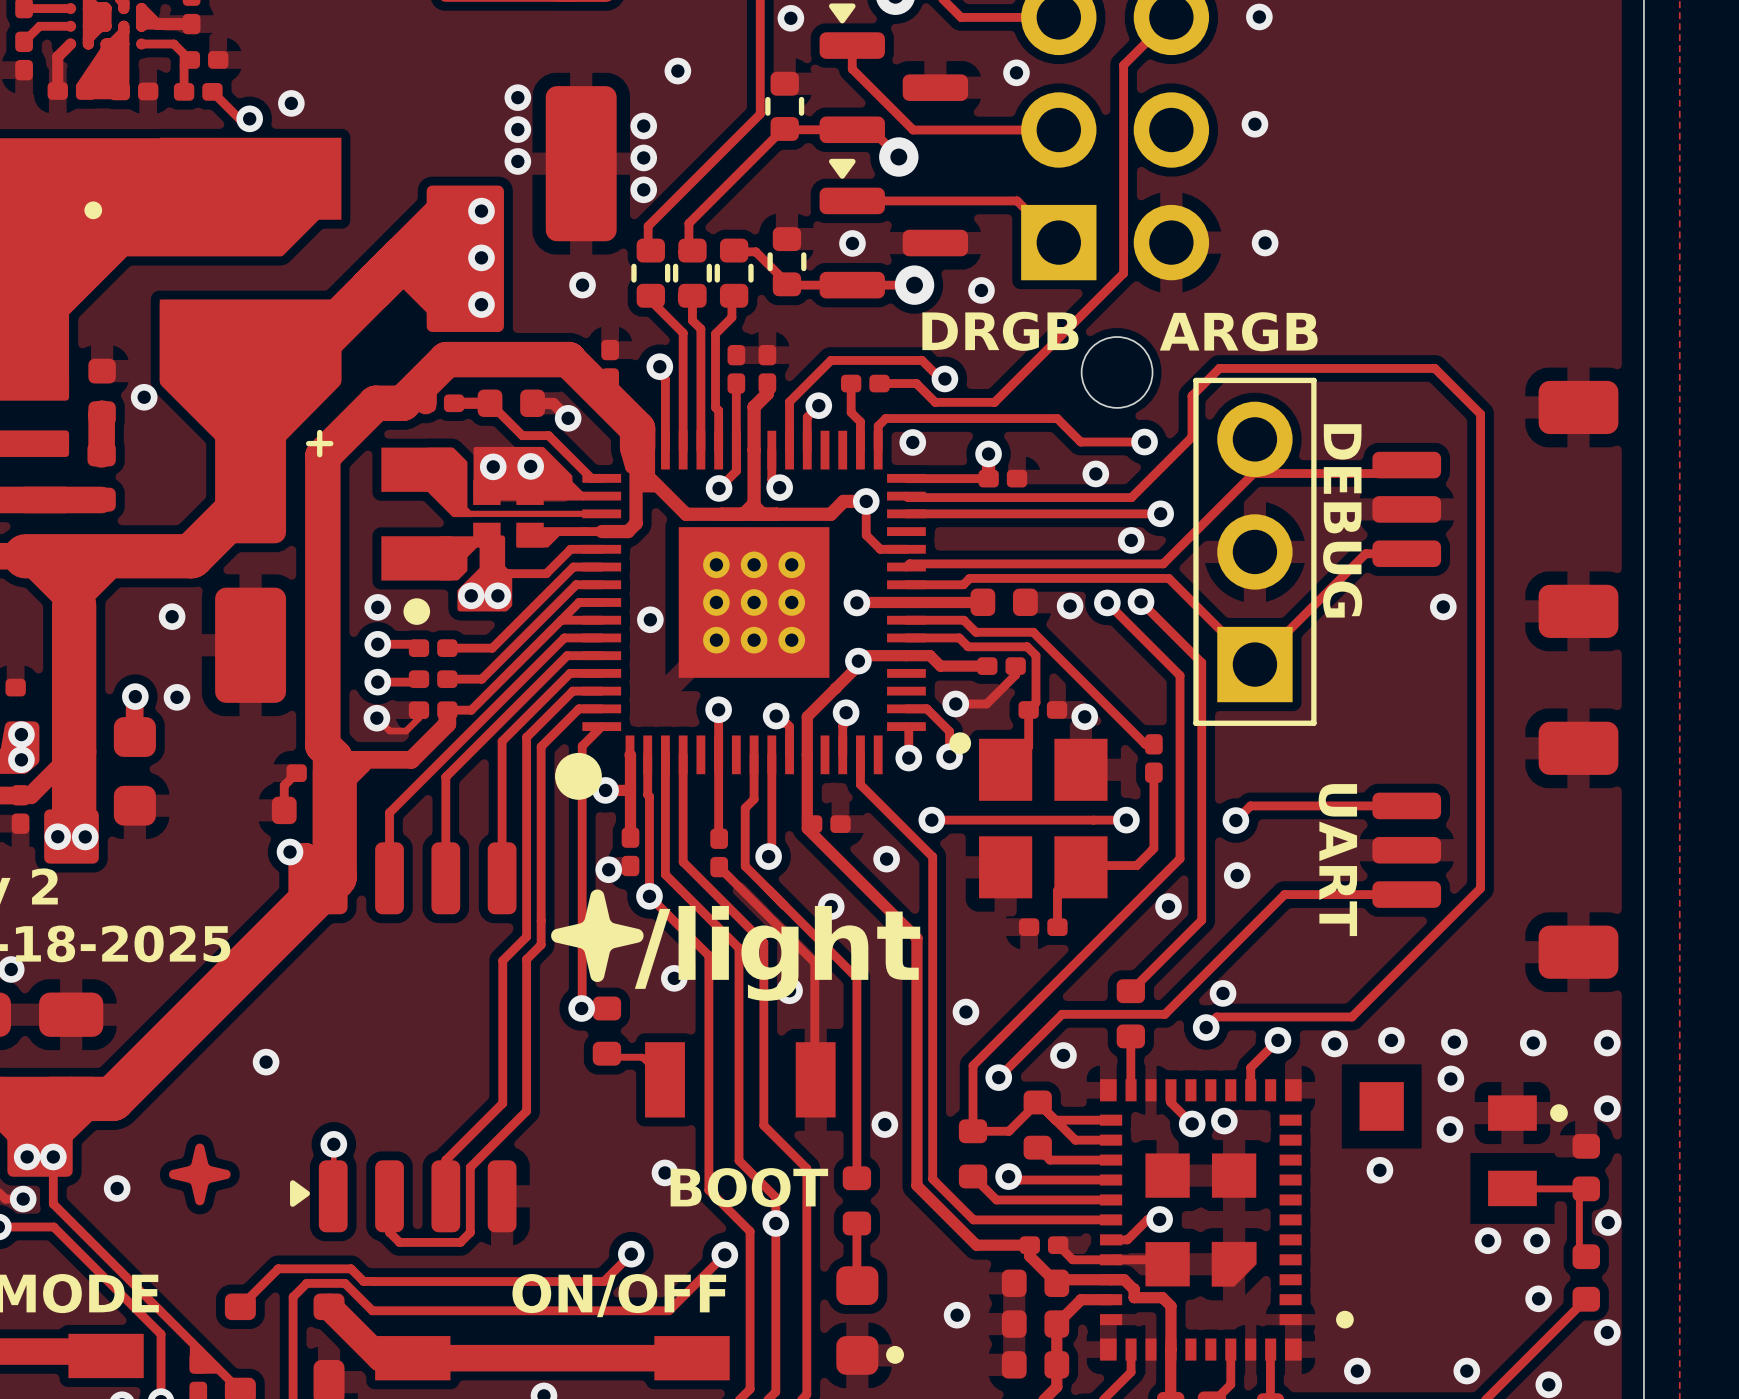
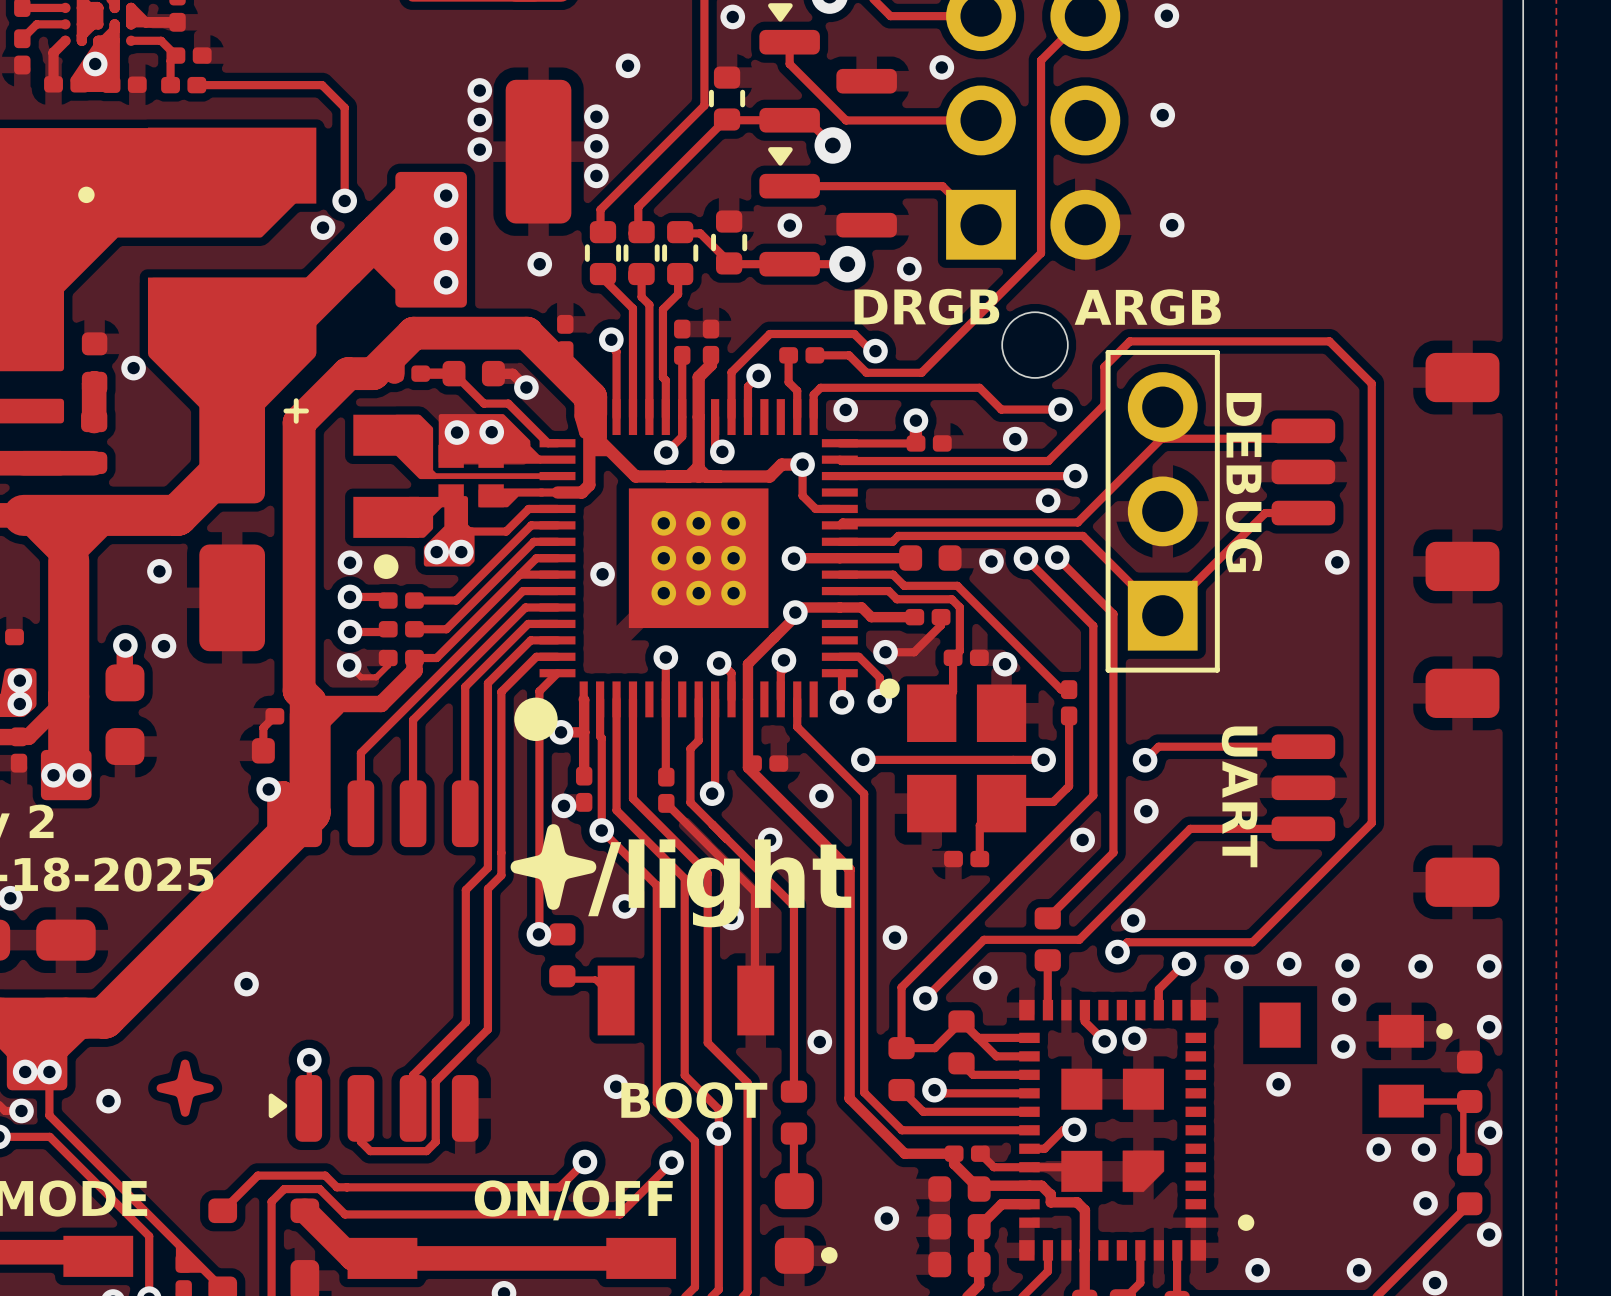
via: none -> (95, 63)
track: (212, 91) (239, 118) (249, 118) -> (196, 85) (322, 85) (344, 107) (344, 200)
via: (291, 103) -> none
via: (249, 118) -> none
via: none -> (344, 200)
via: none -> (323, 227)

